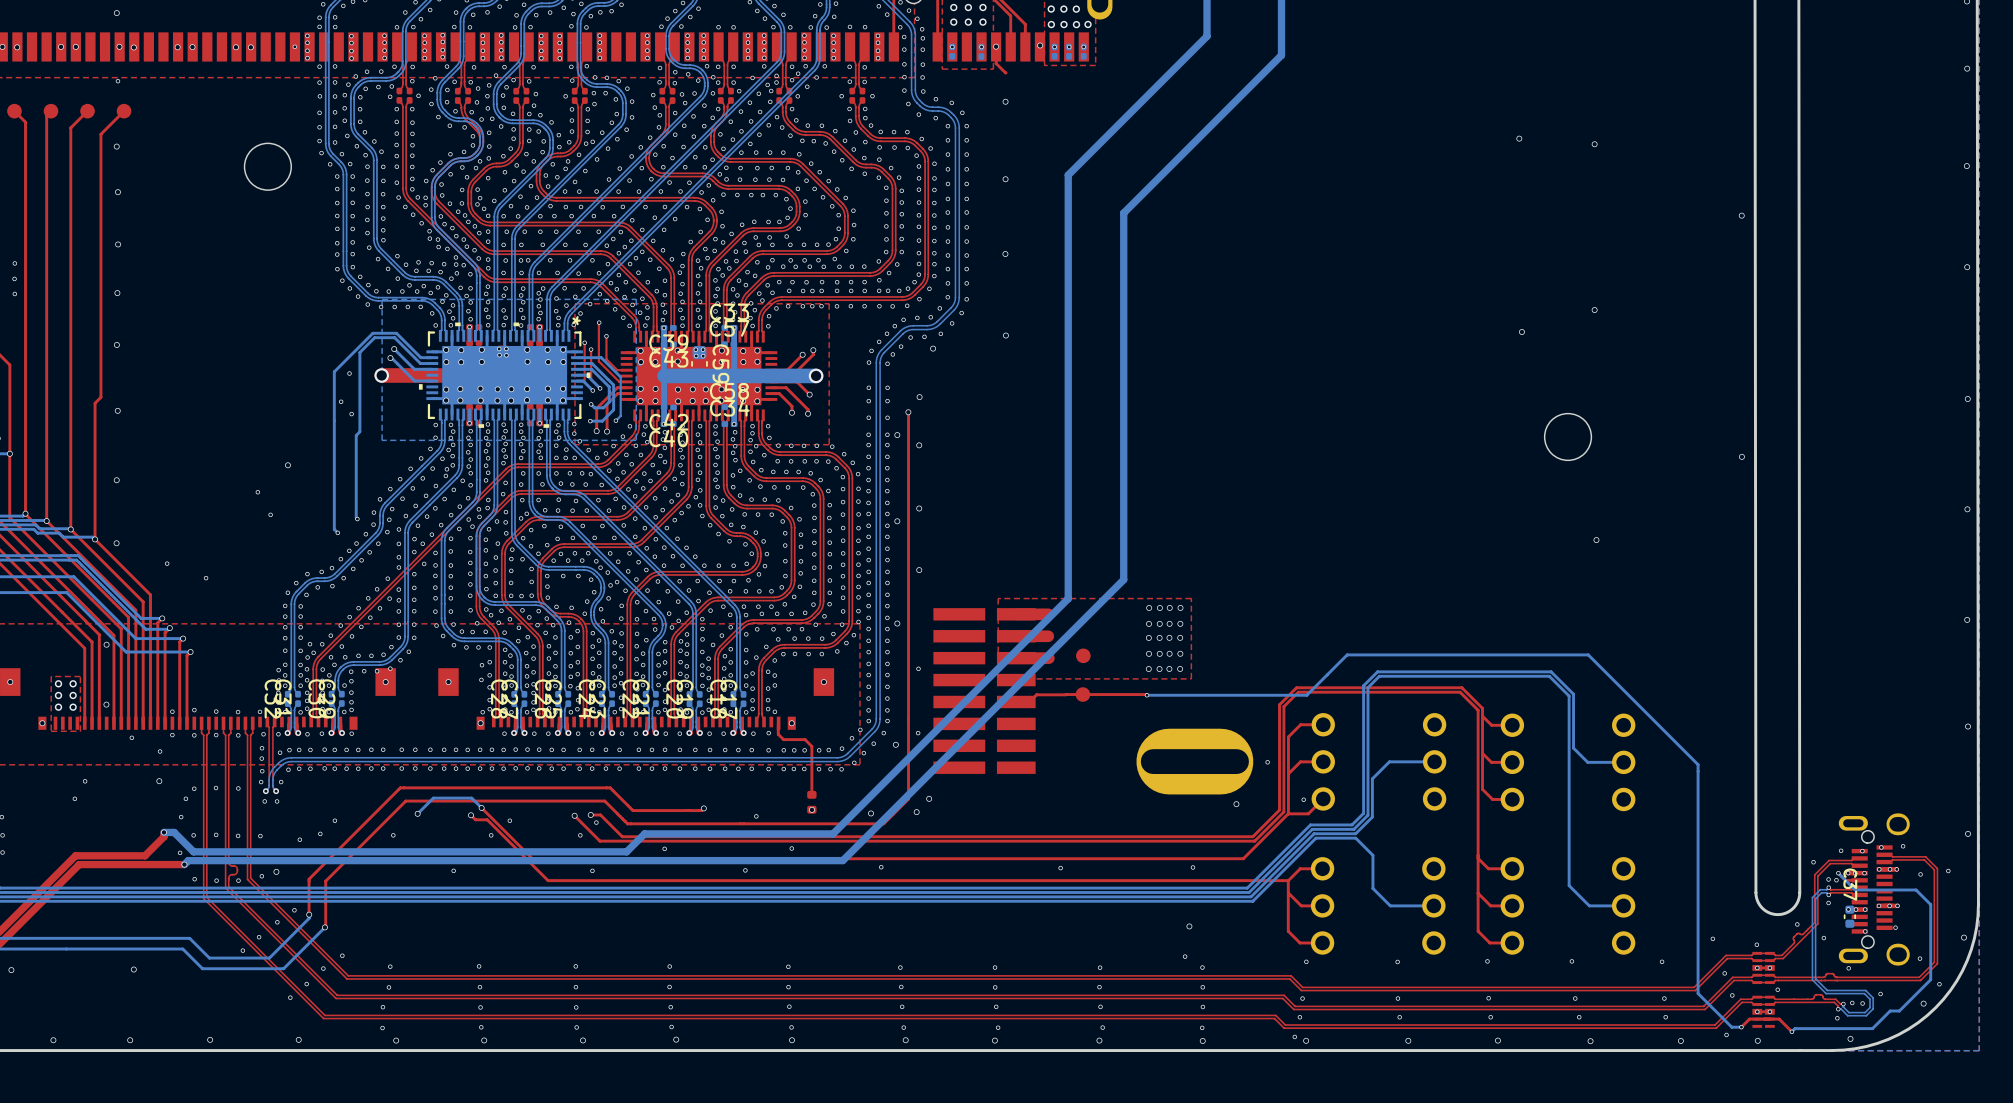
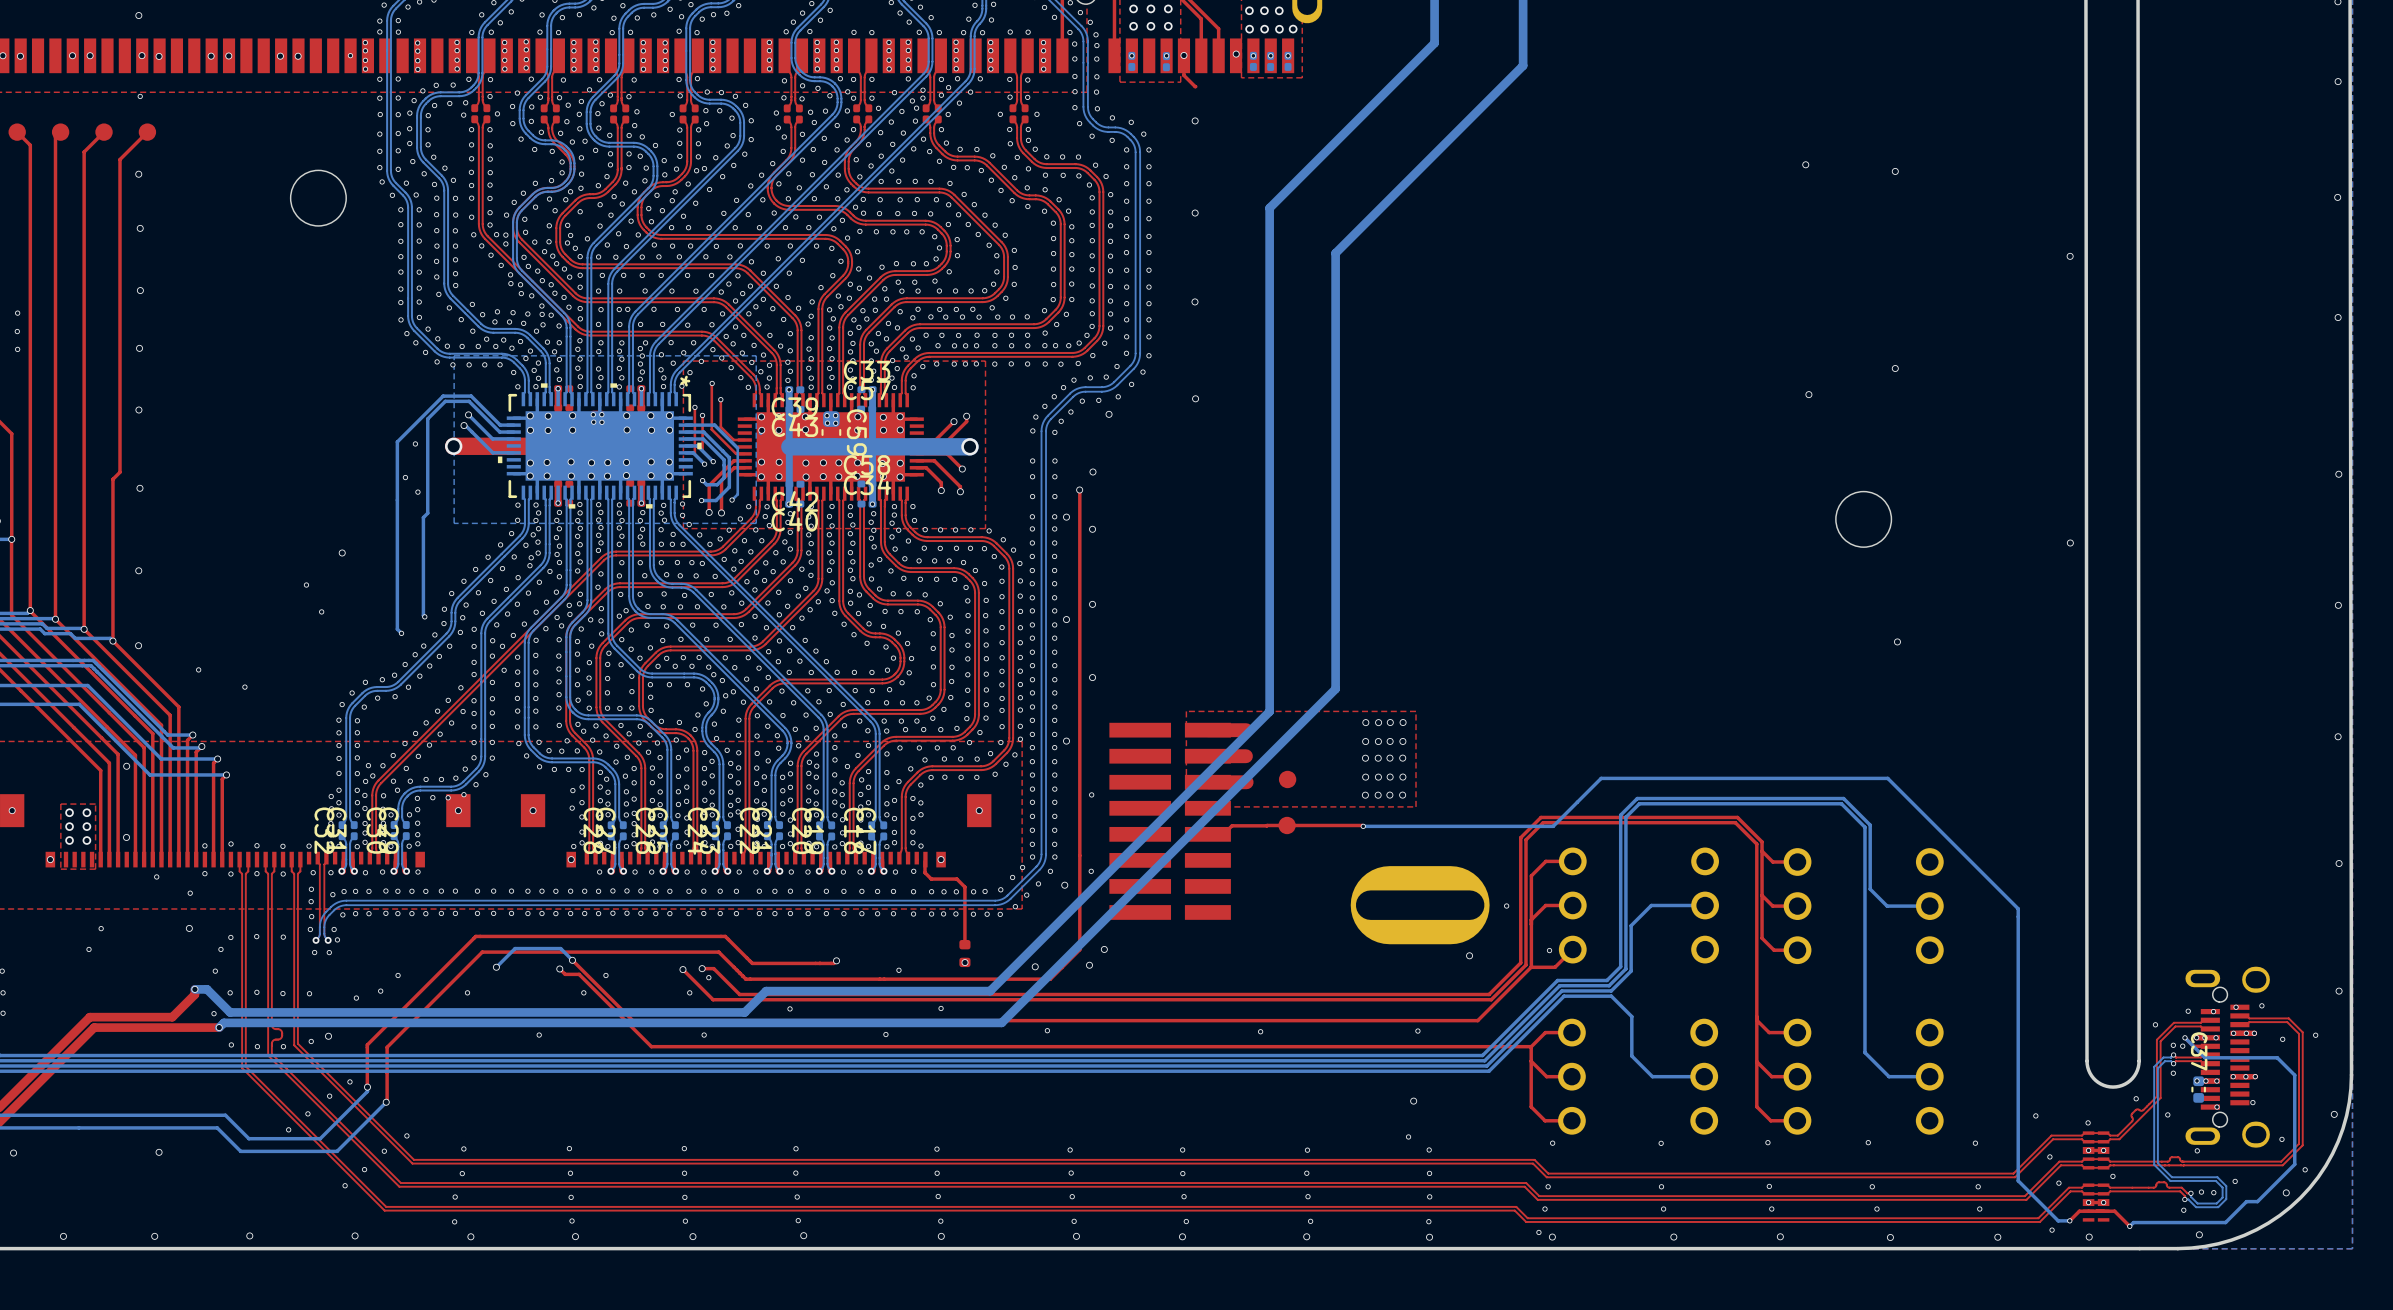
via: (329, 675) -> none
via: none -> (337, 939)

